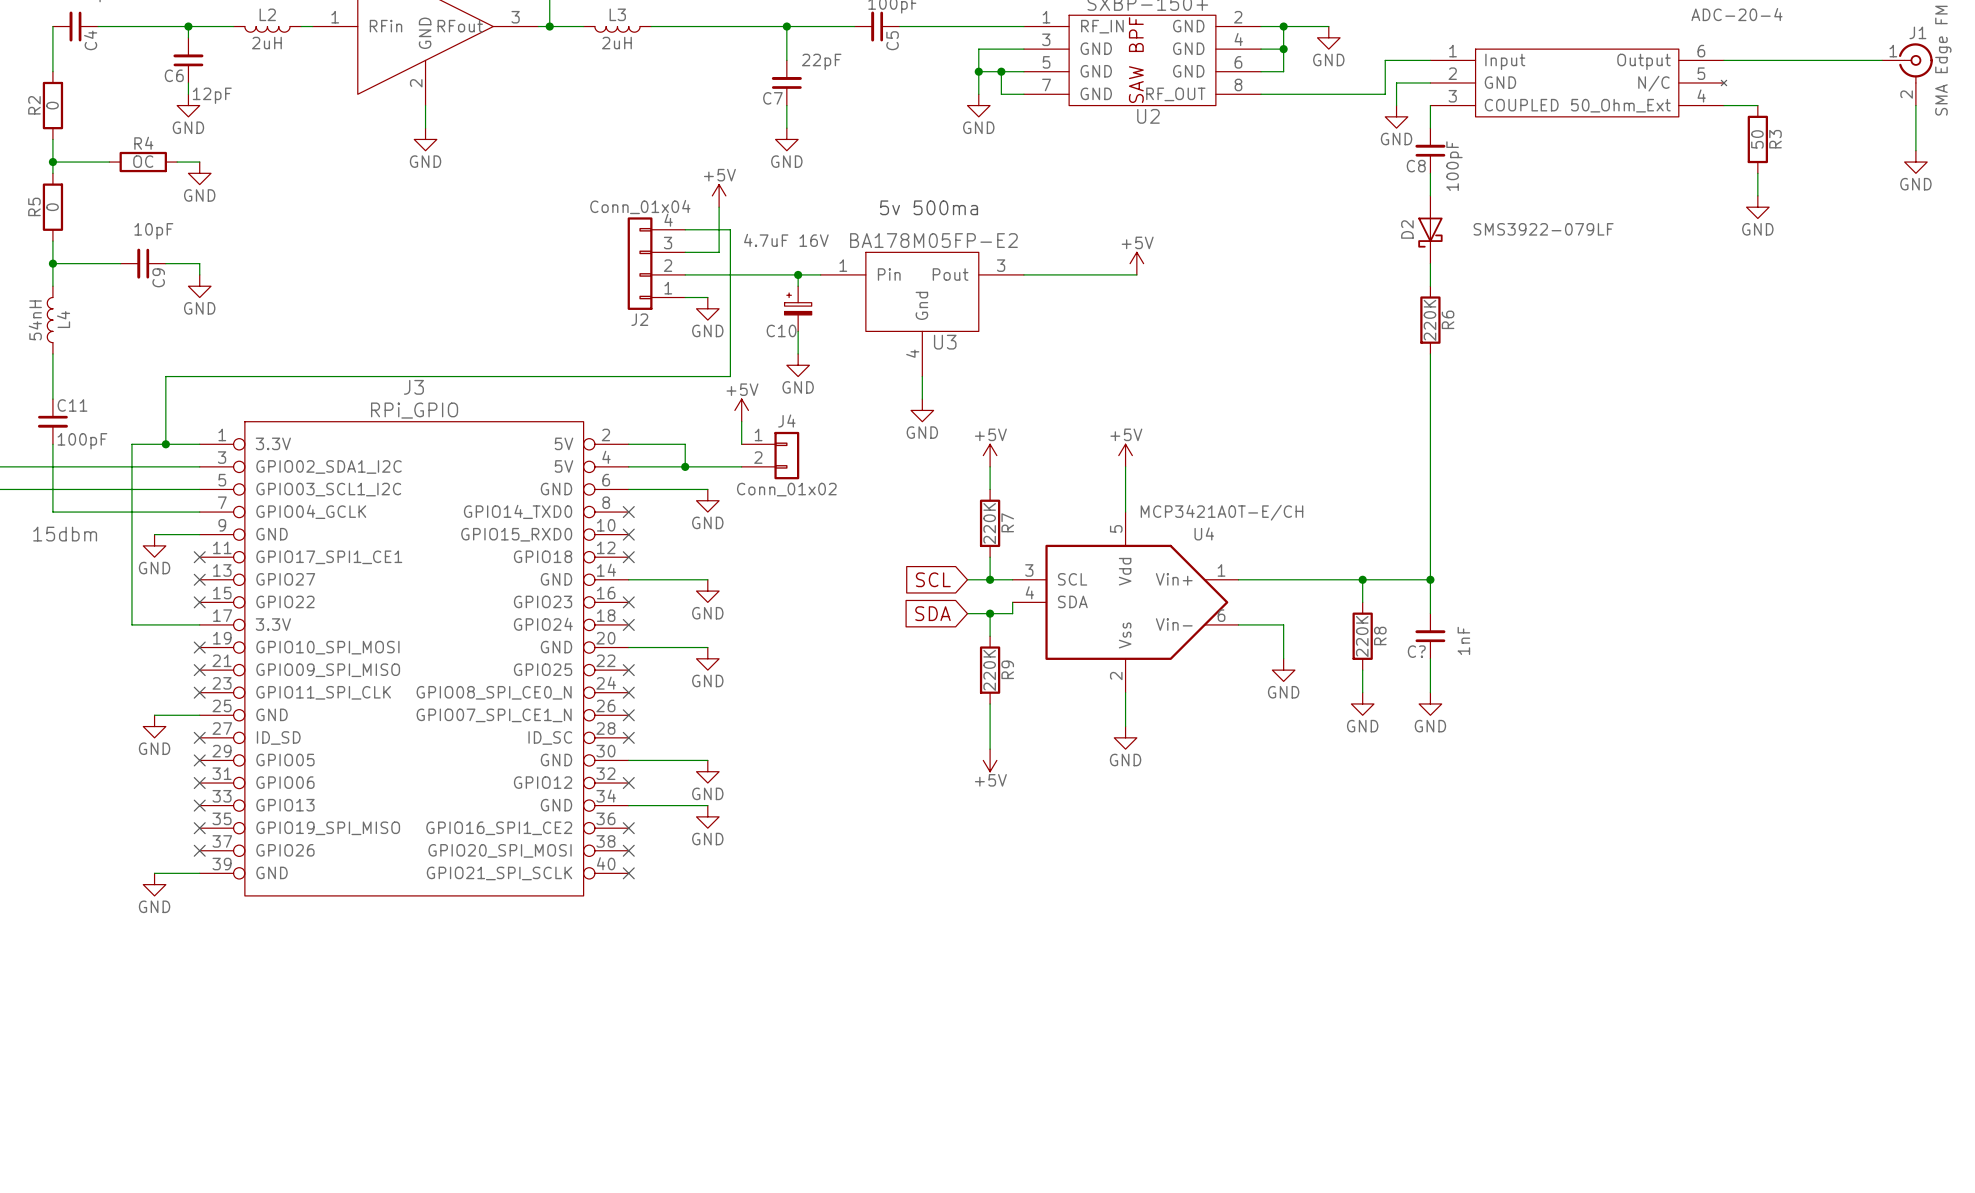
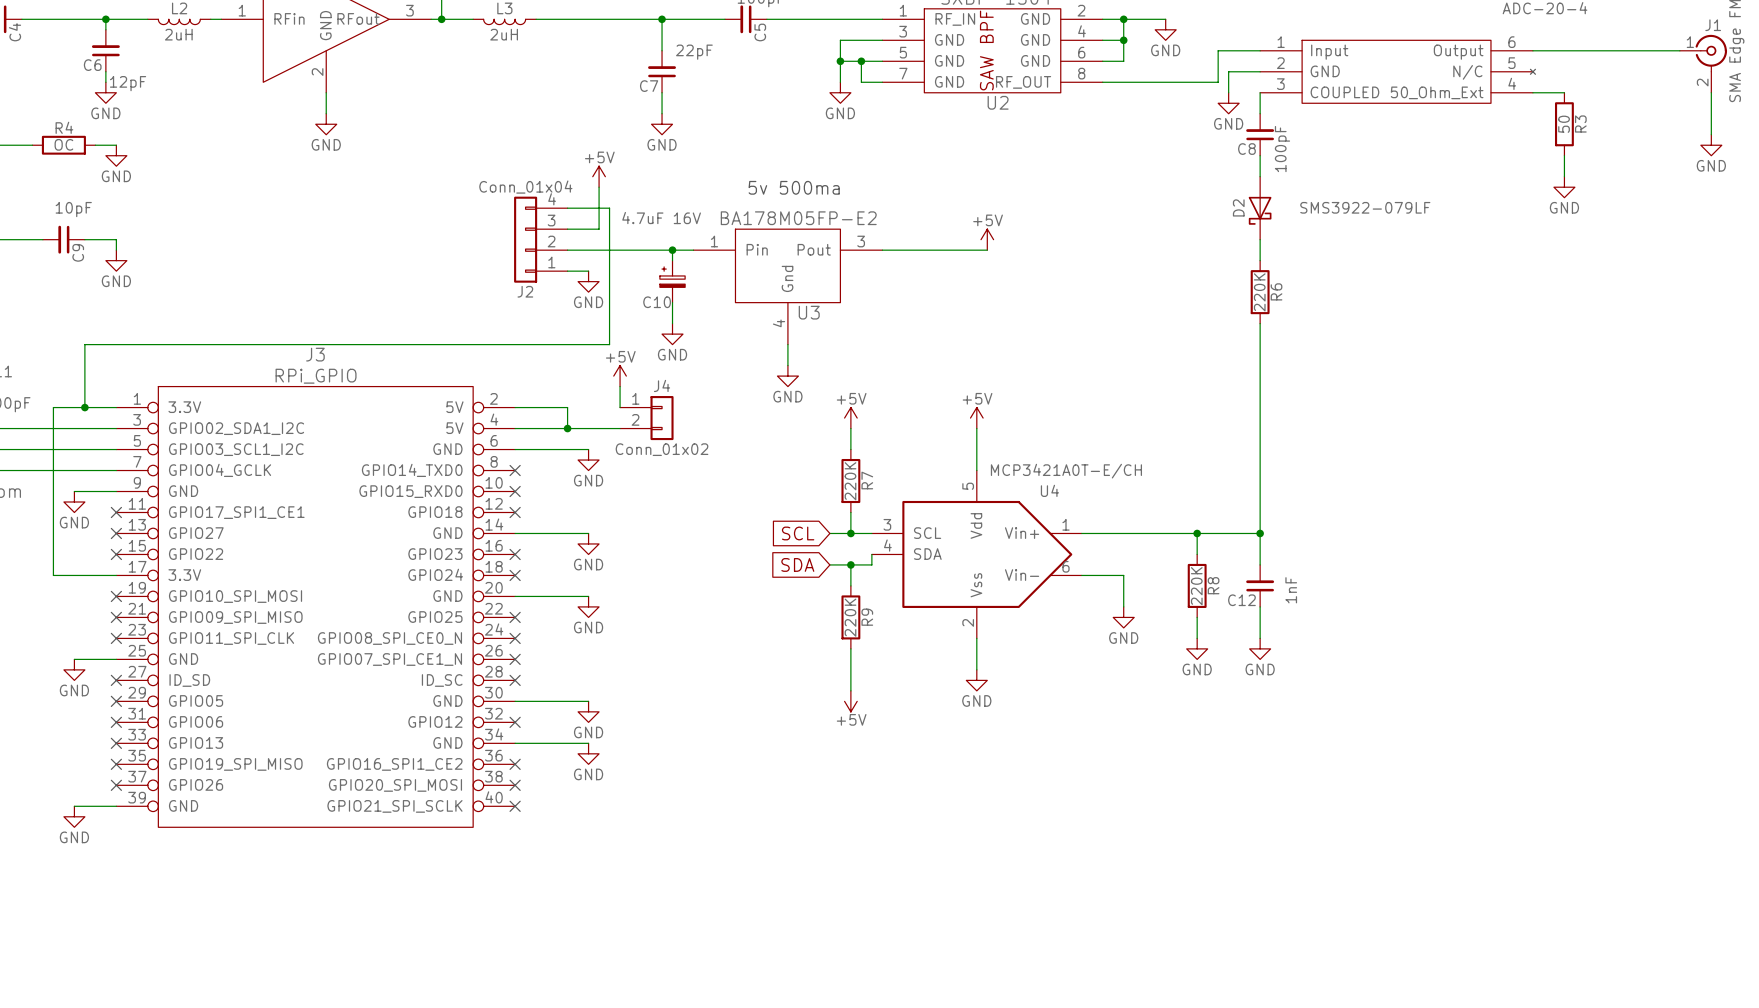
C? name: C? (1416, 651) -> C12 (1241, 600)

